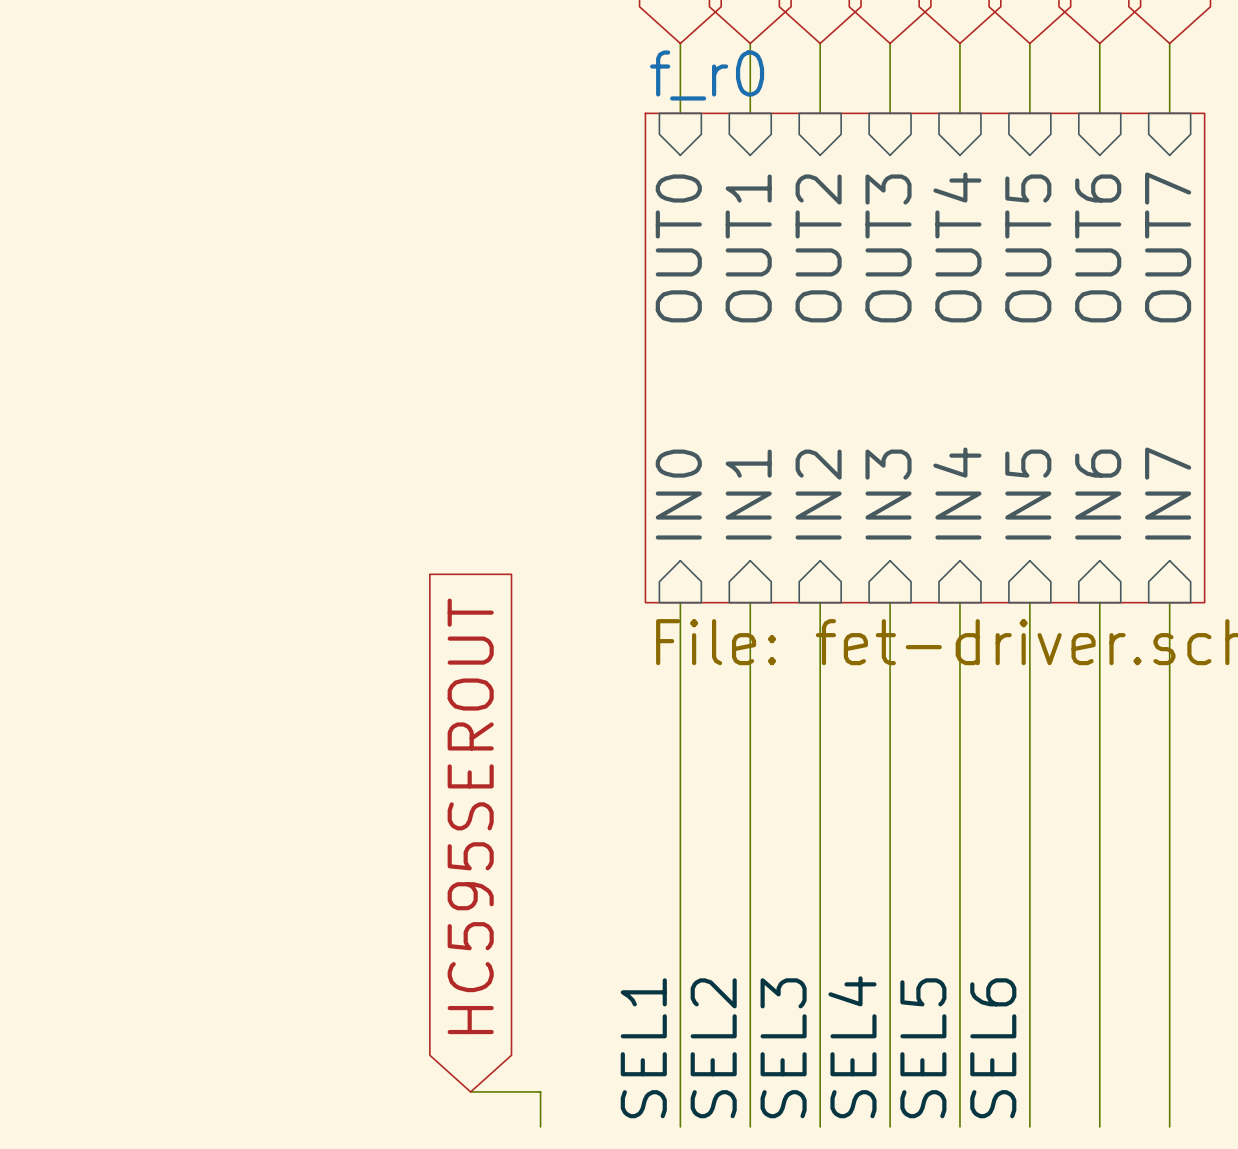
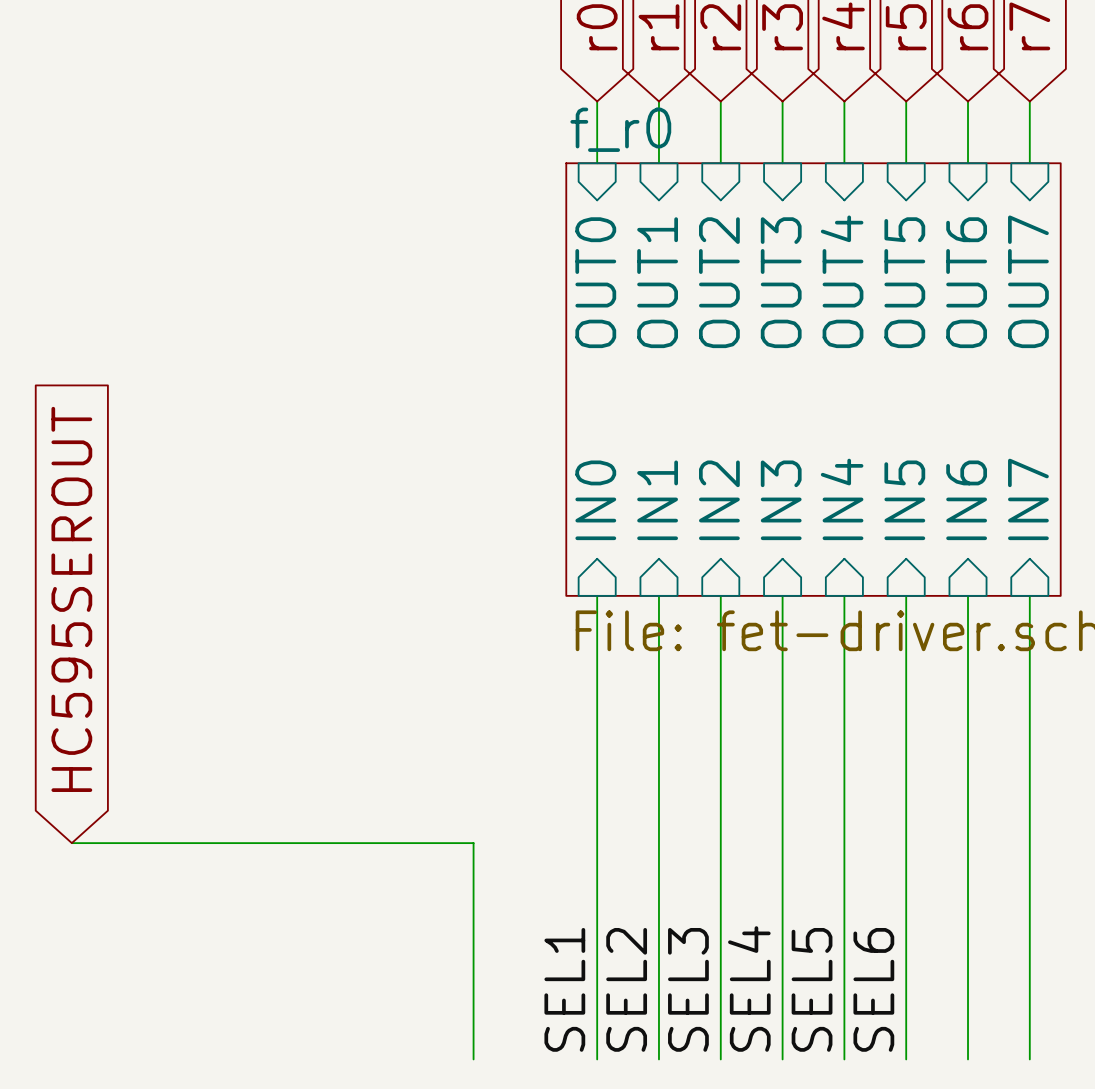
global label position: HC595SEROUT (470, 816) -> HC595SEROUT (71, 599)
wire: (470, 1091) (540, 1091) -> (71, 843) (473, 843) (473, 1028)

